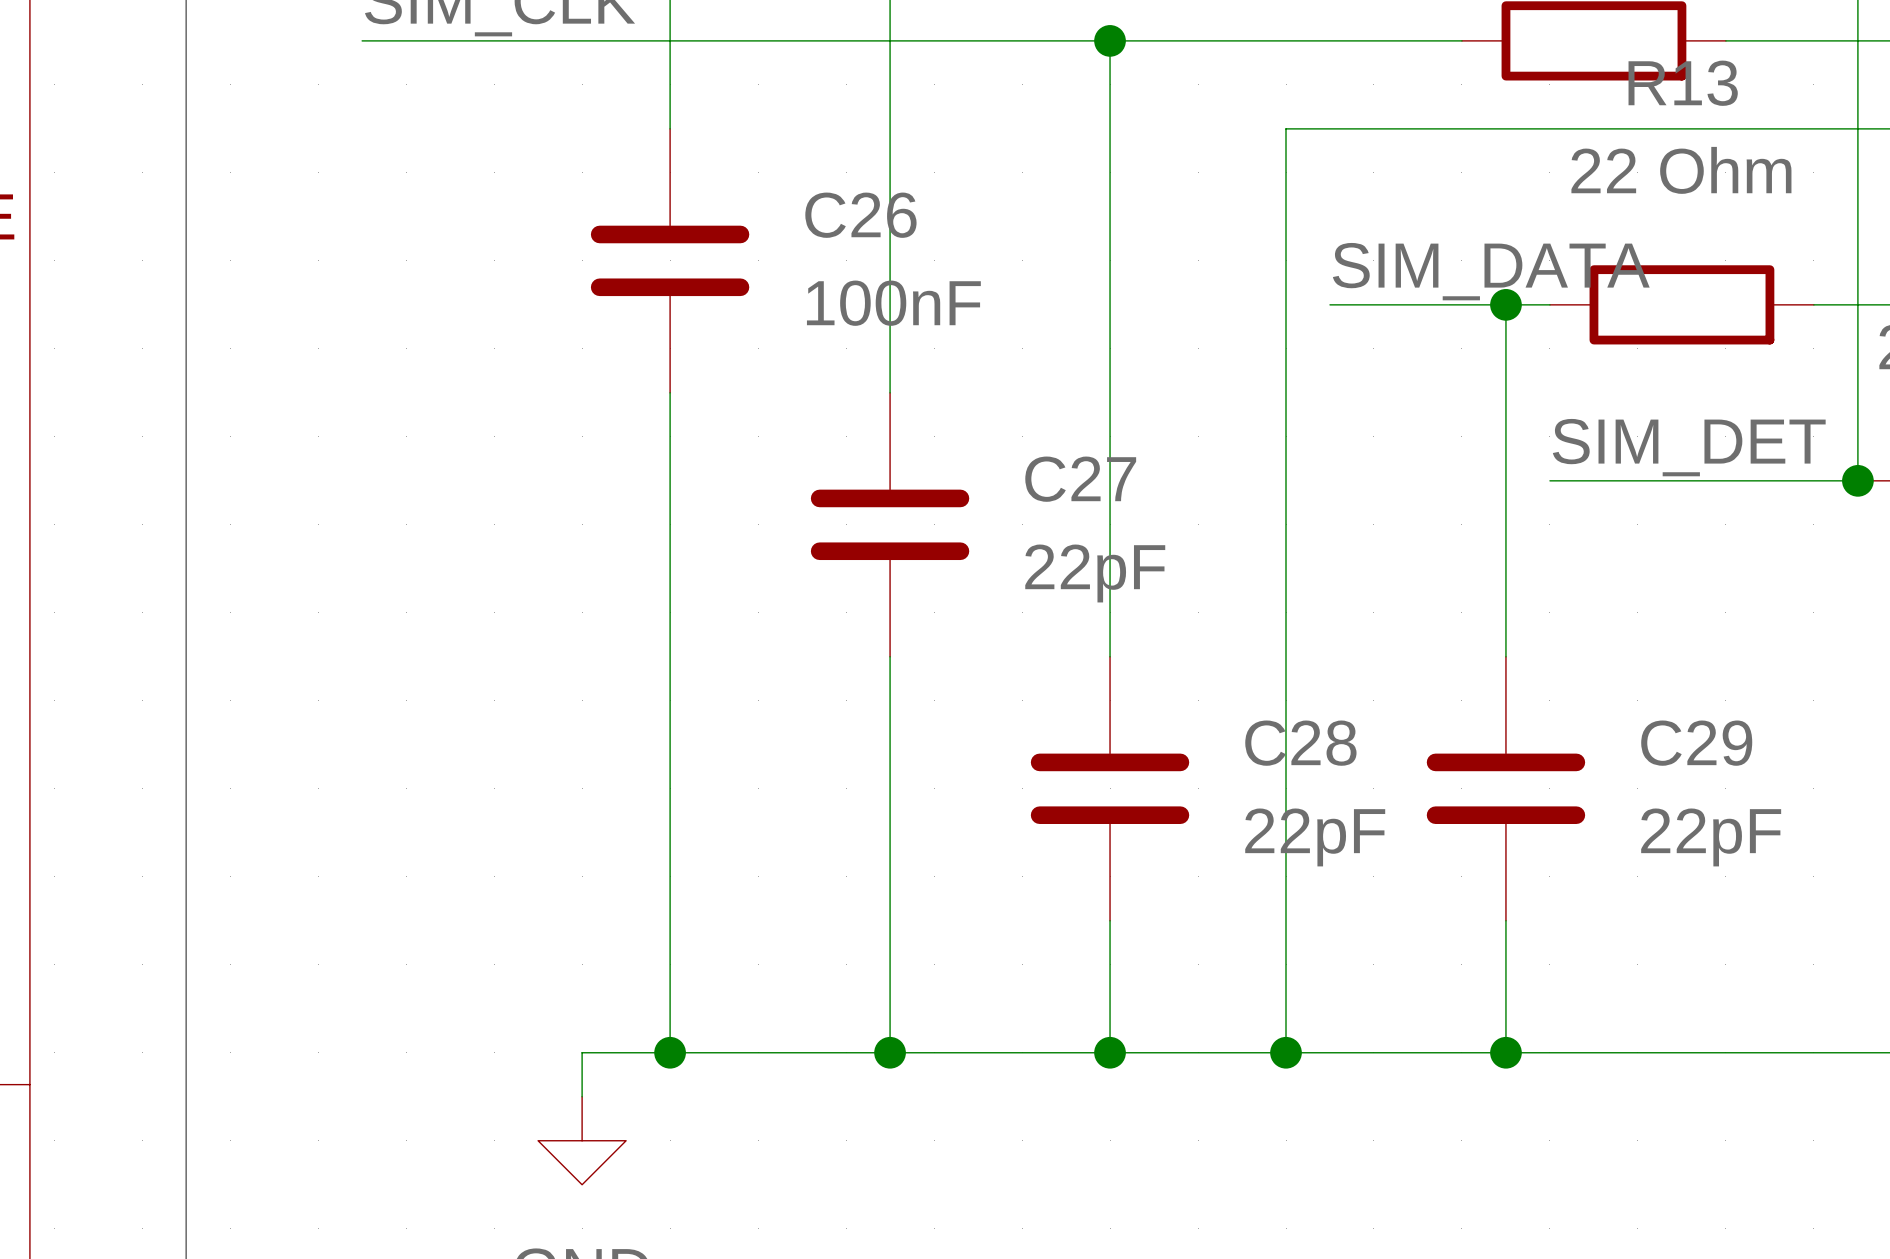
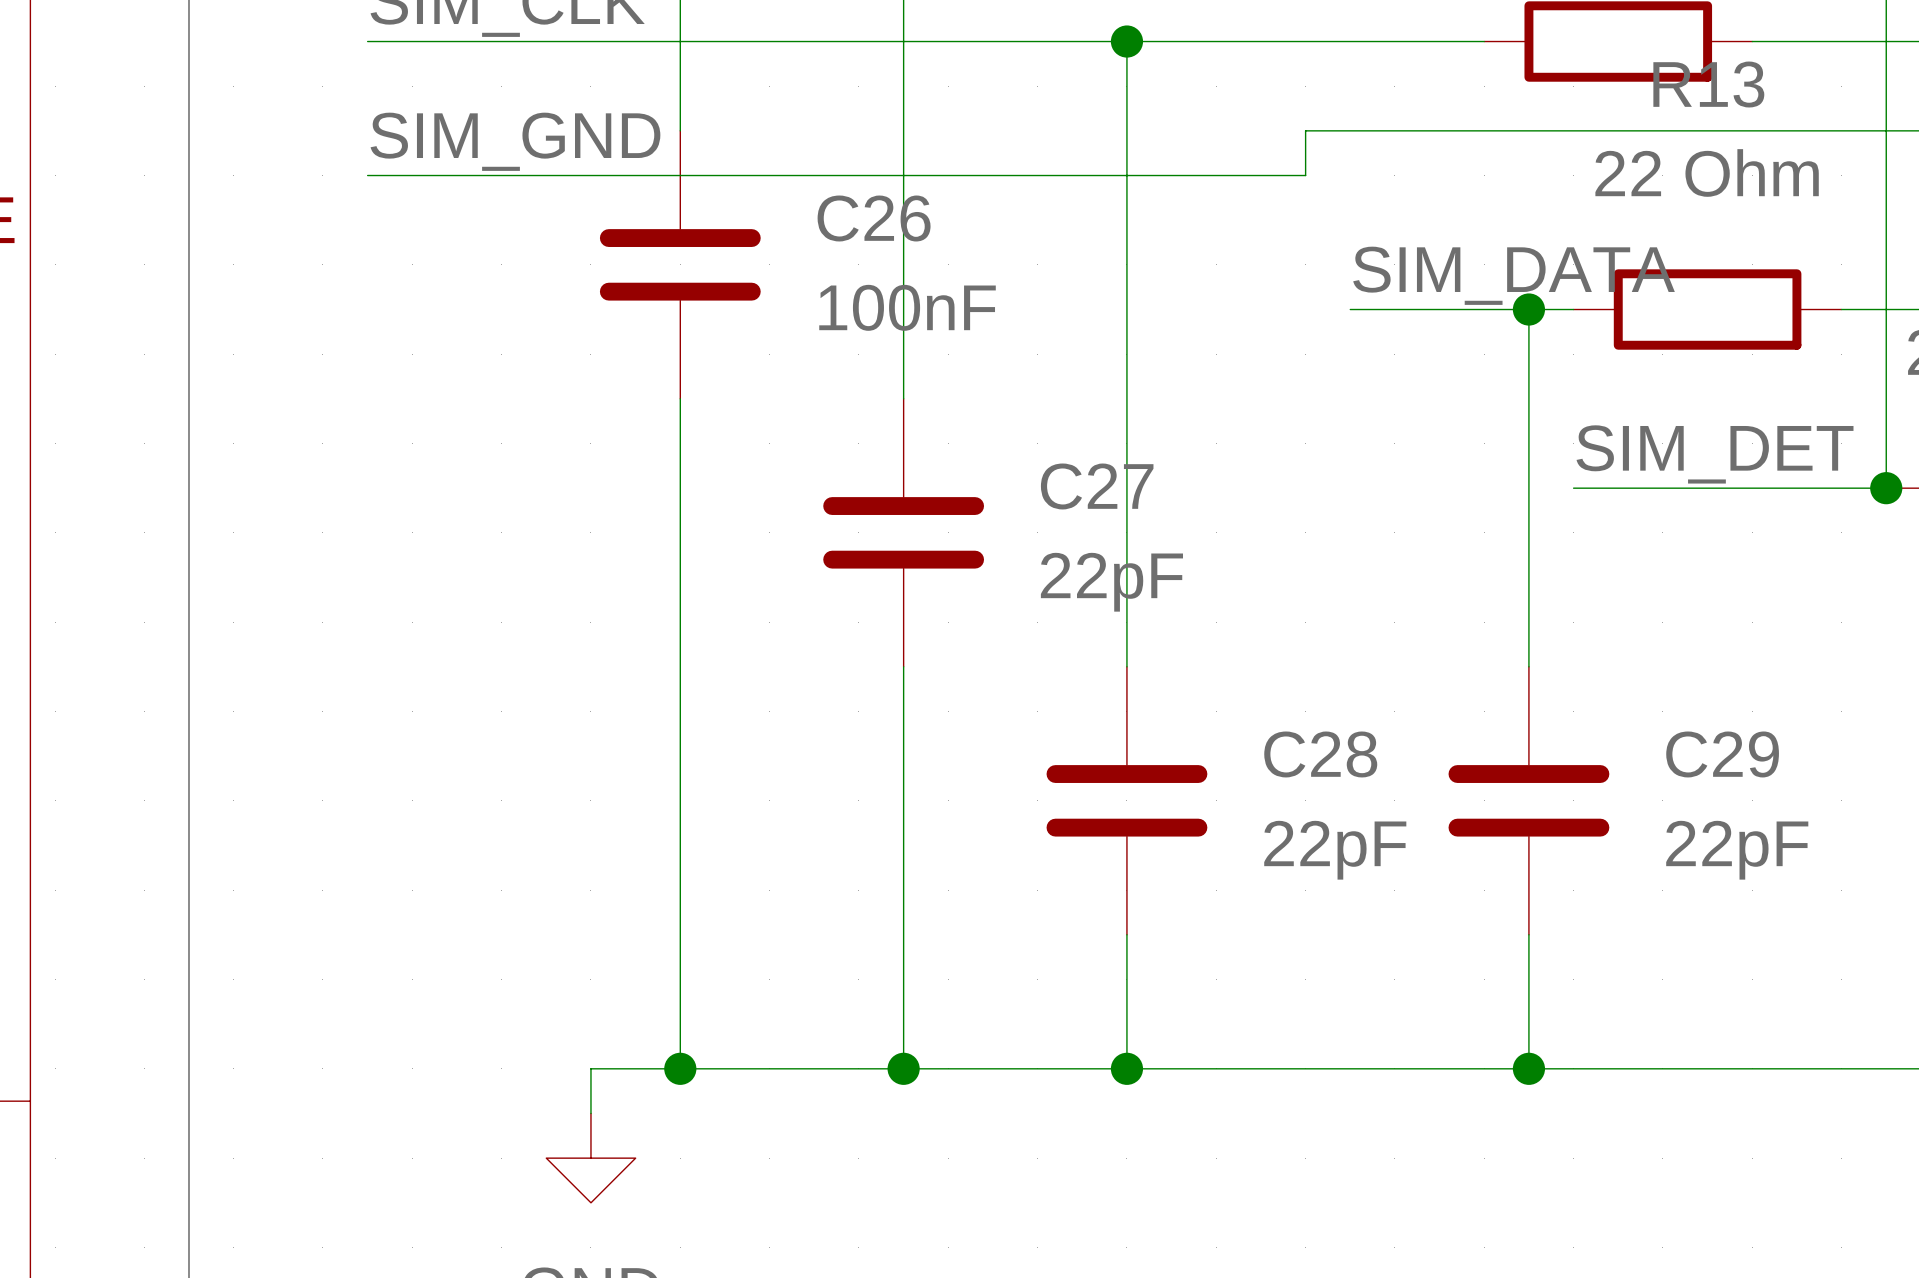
label: none -> SIM_GND (515, 141)
wire: (1286, 172) (1286, 1052) -> (1305, 175) (367, 175)
junction: (1286, 1052) -> none

